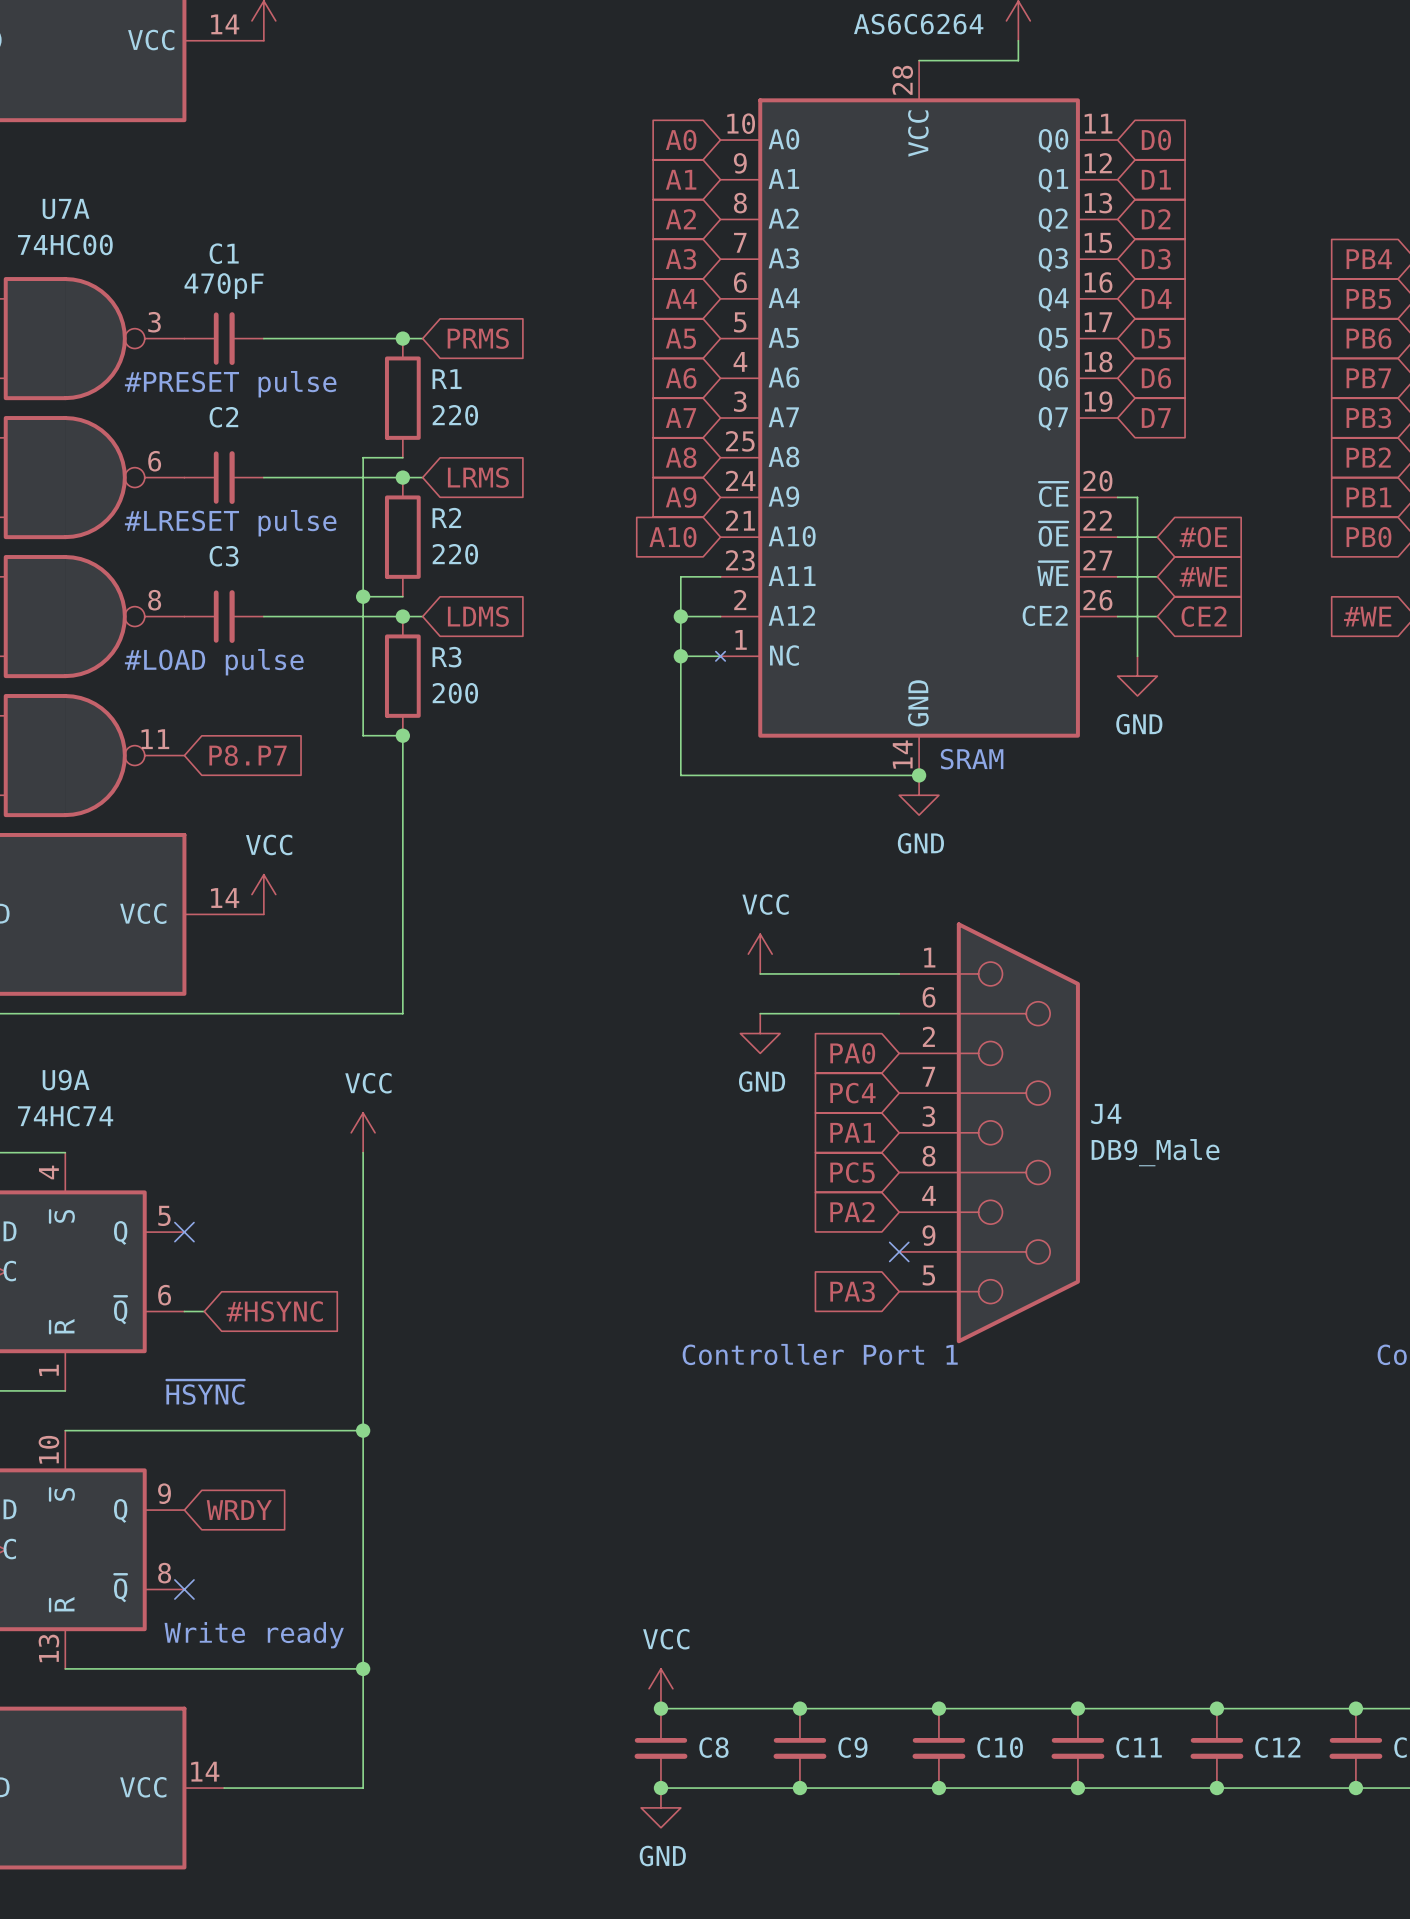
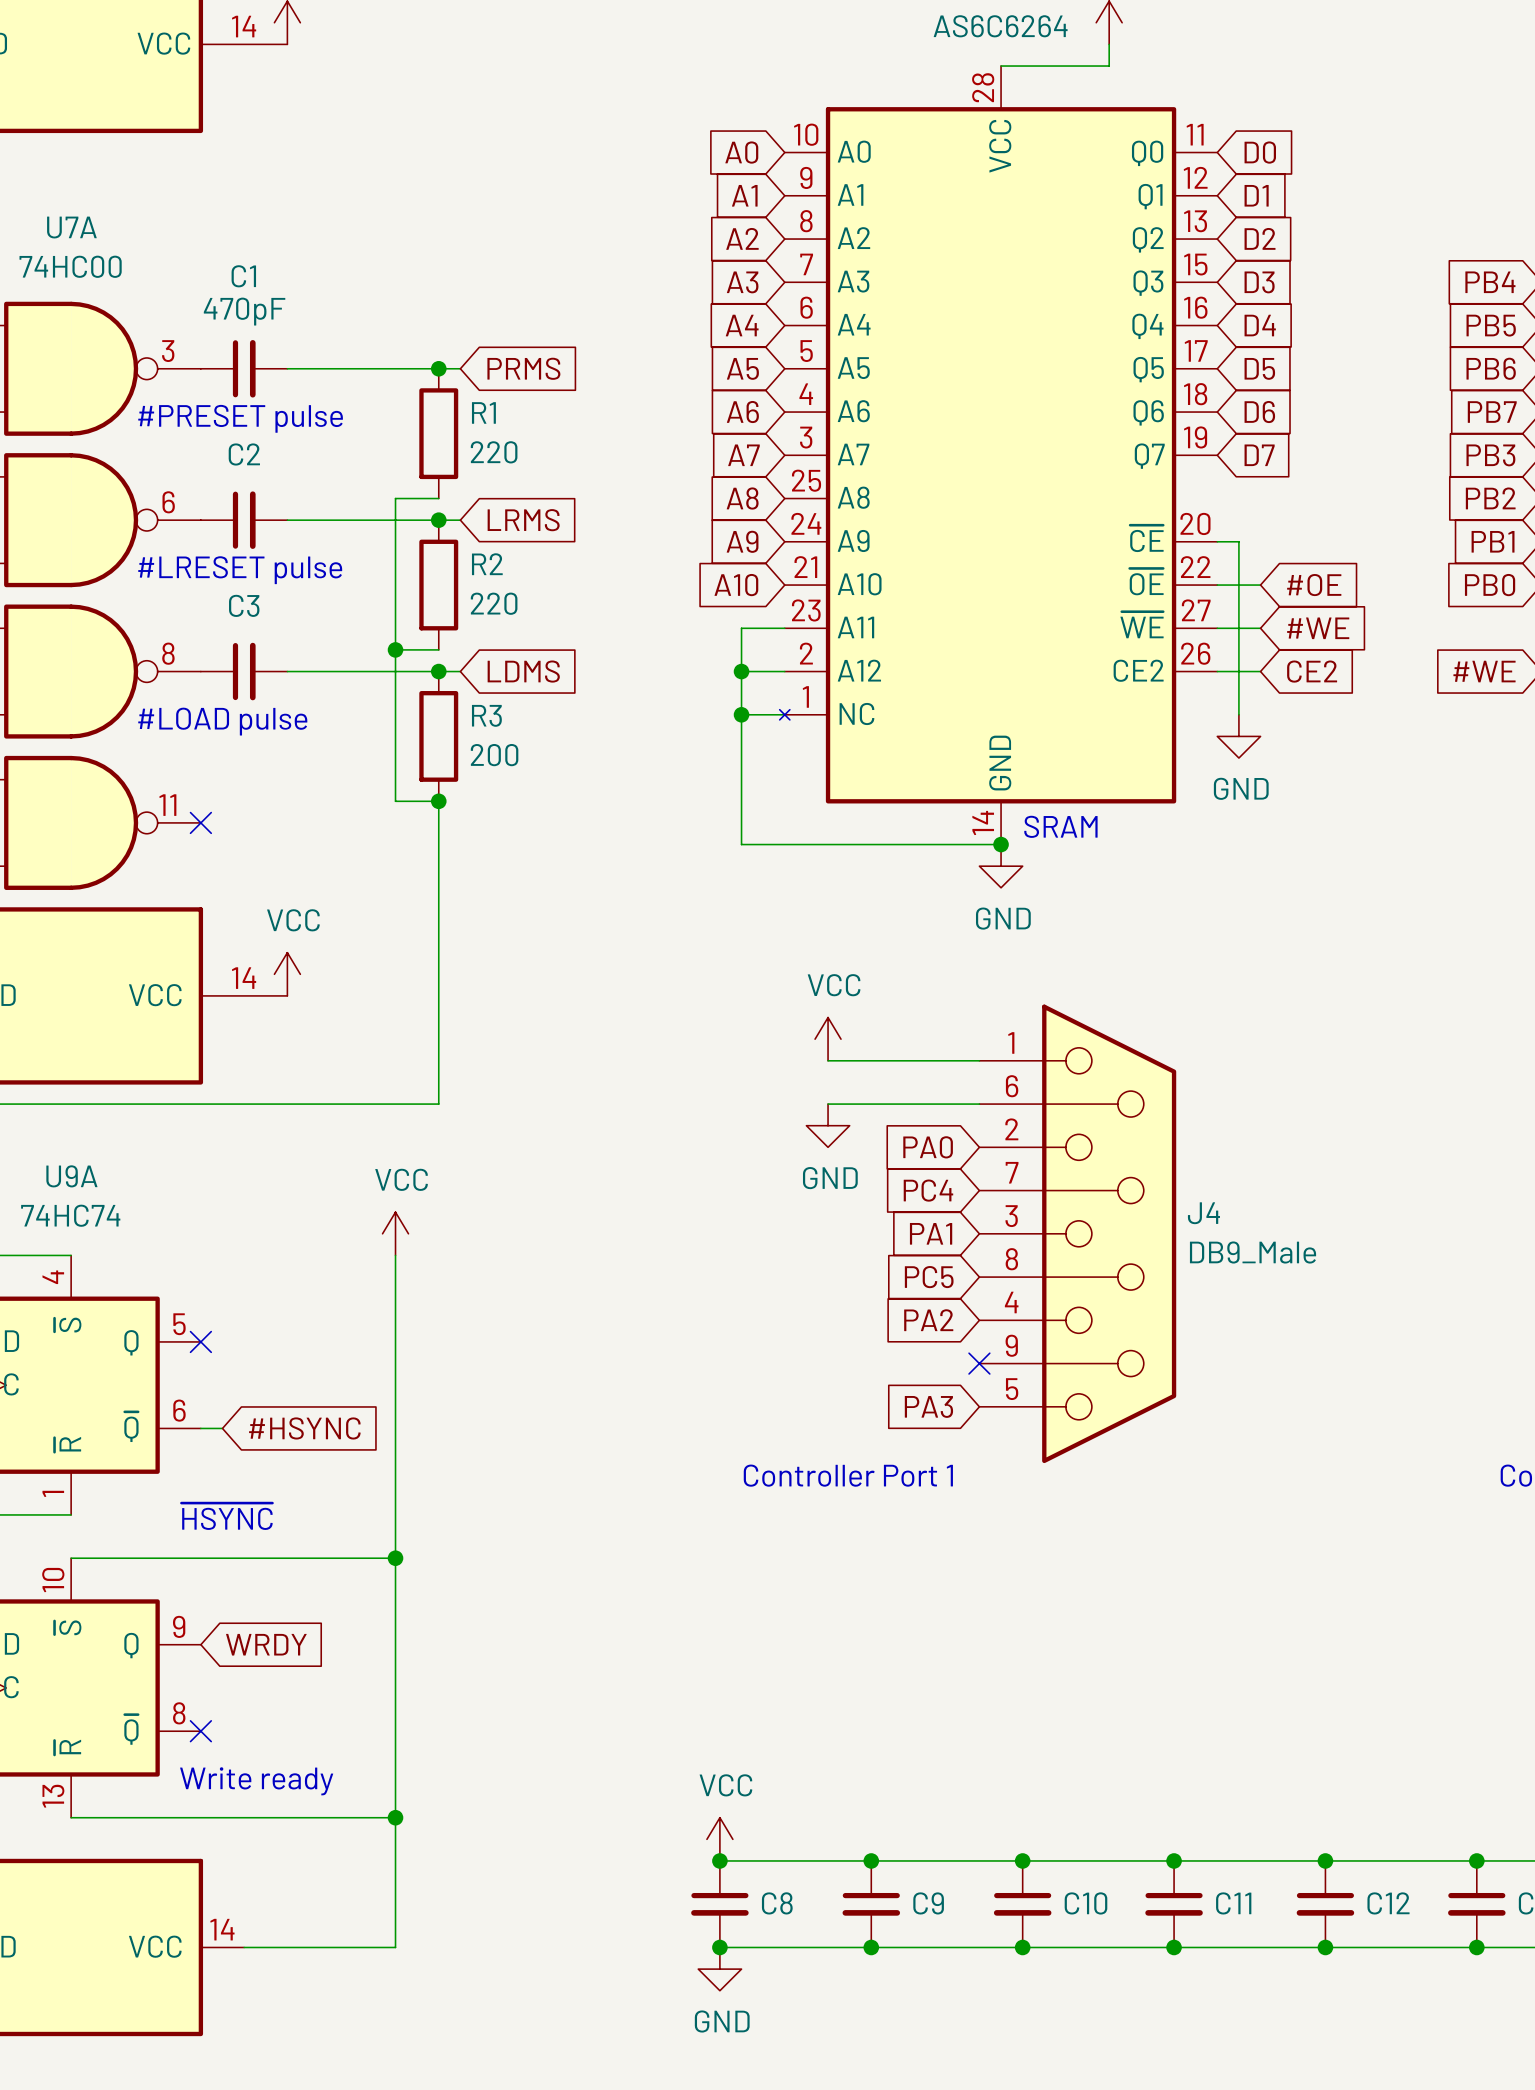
no-connect mark: none -> (200, 822)
global label: P8.P7 (248, 755) -> none

